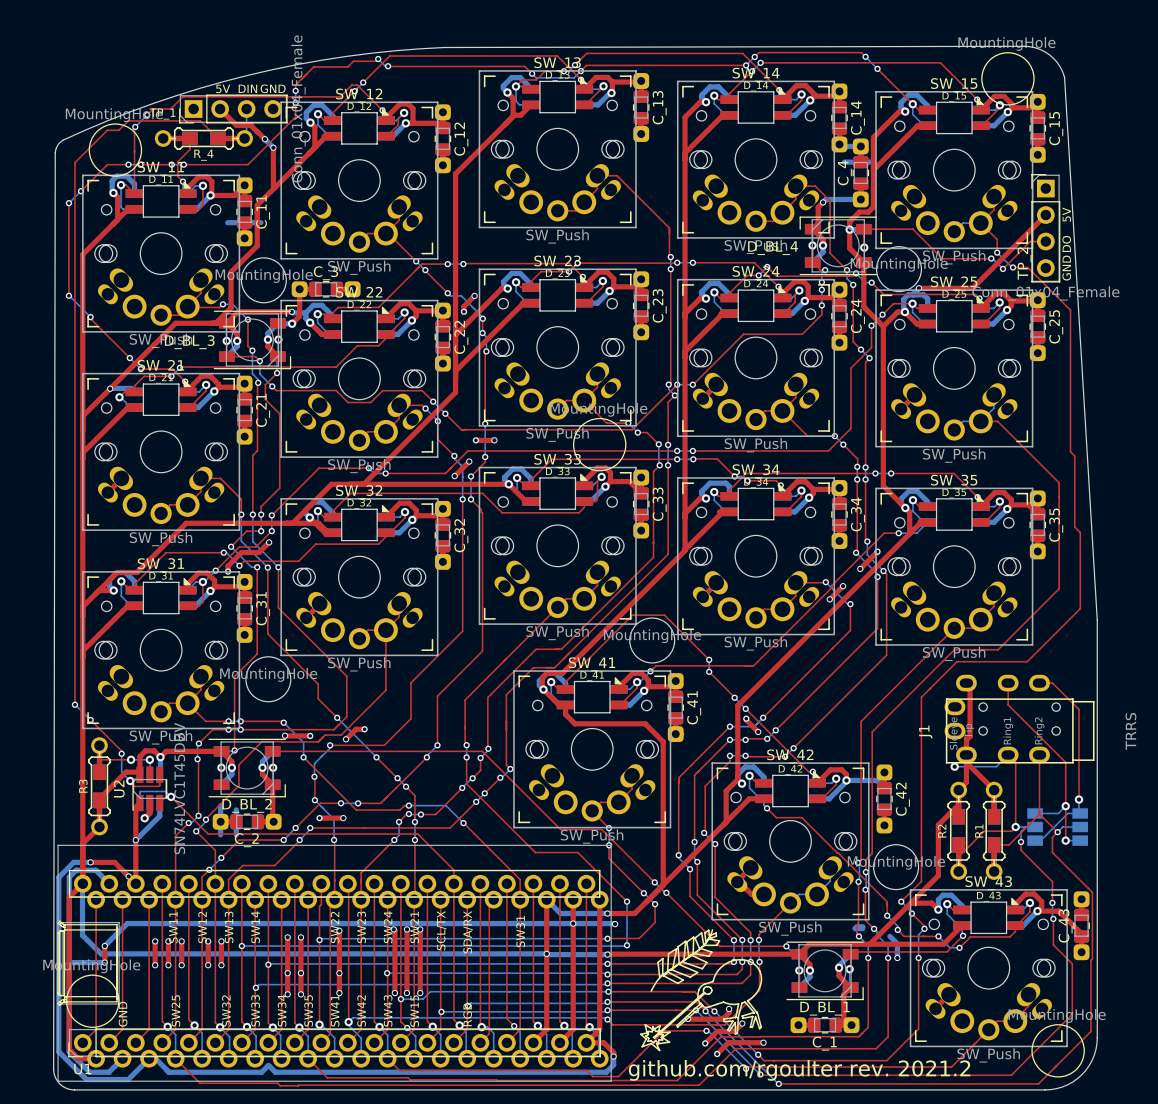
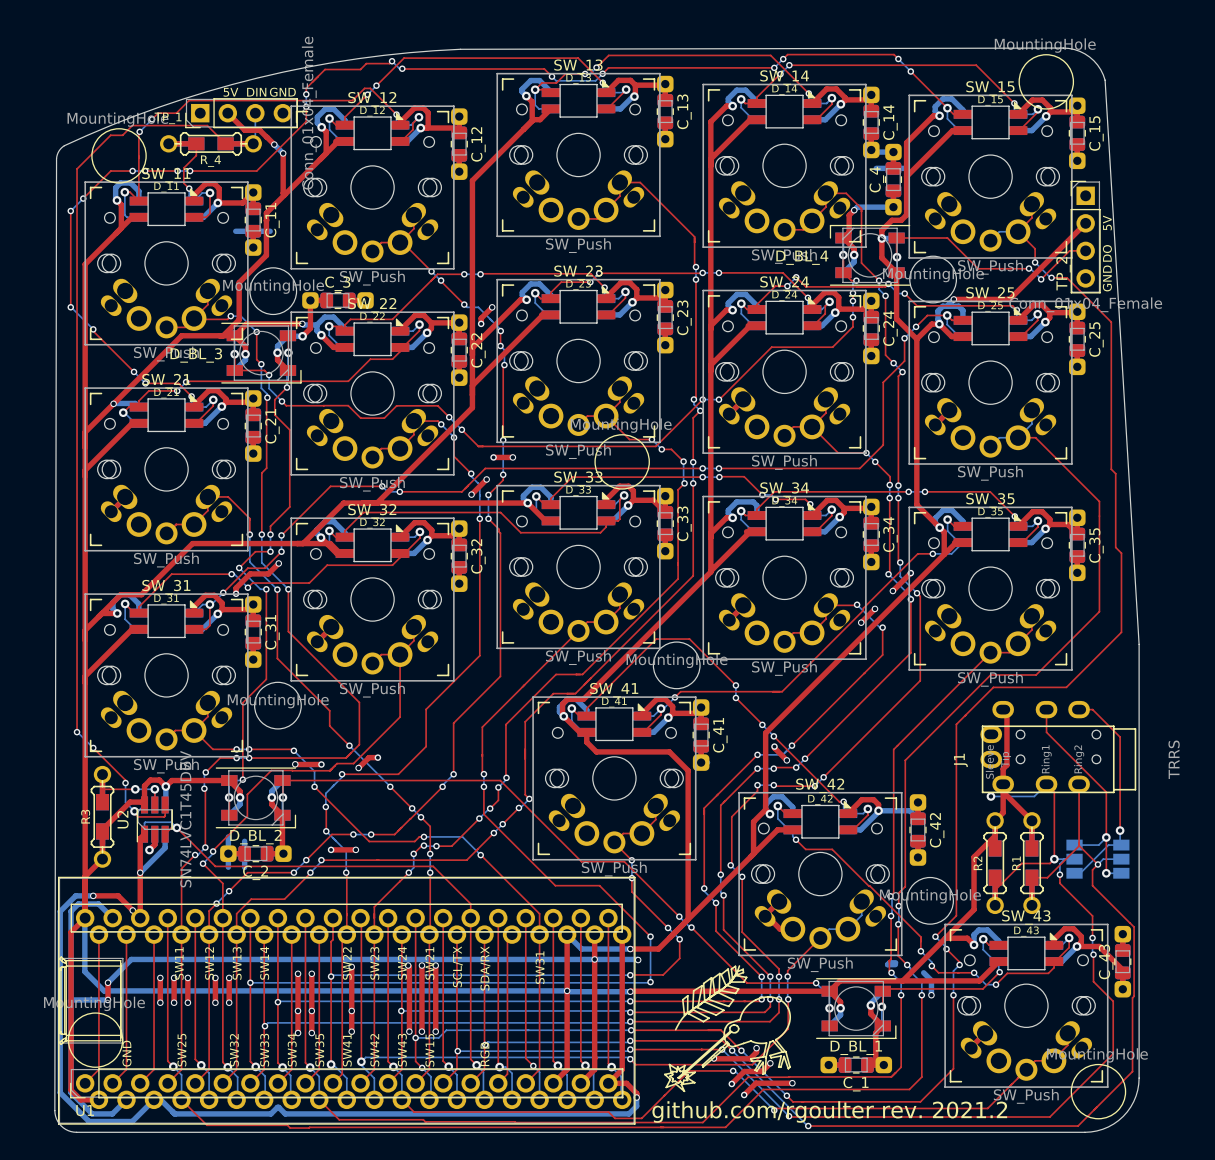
U1 footprint: [57, 844, 612, 1082] -> [57, 876, 636, 1125]

